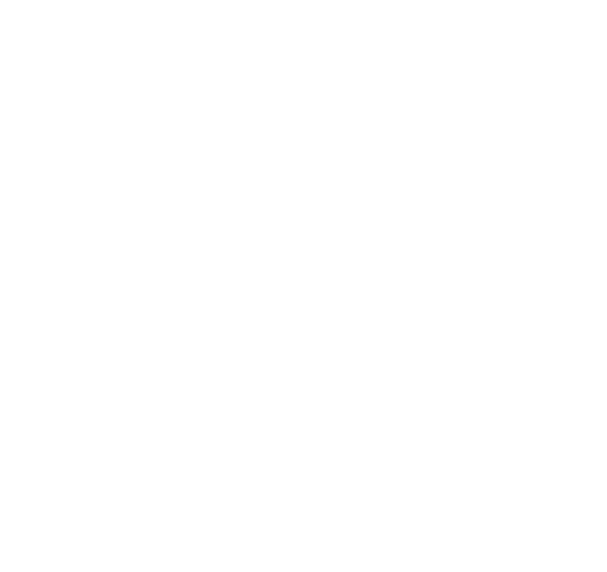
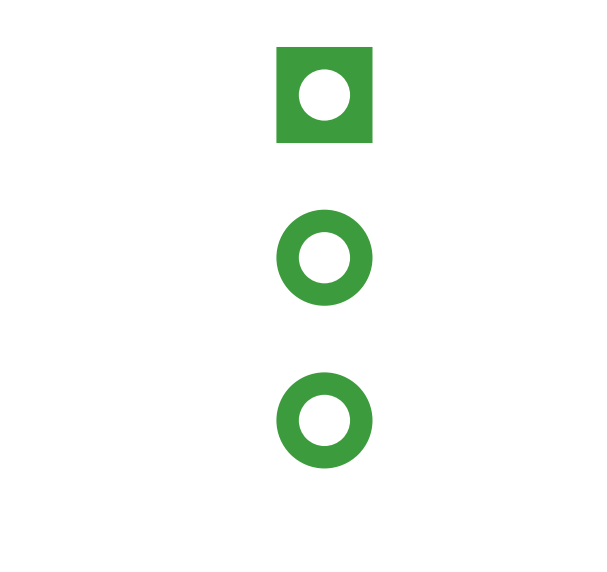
part: none -> (324, 257)

